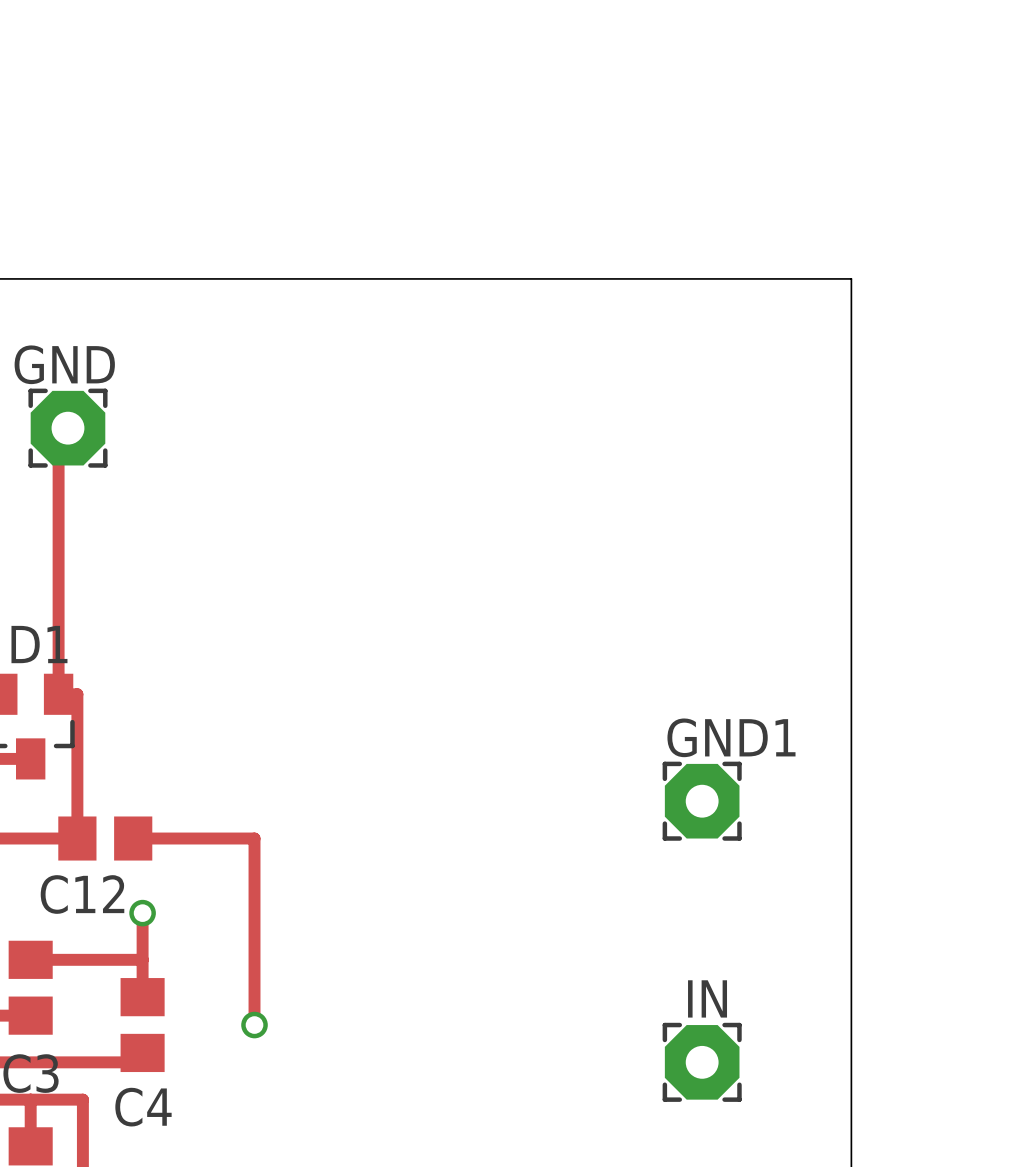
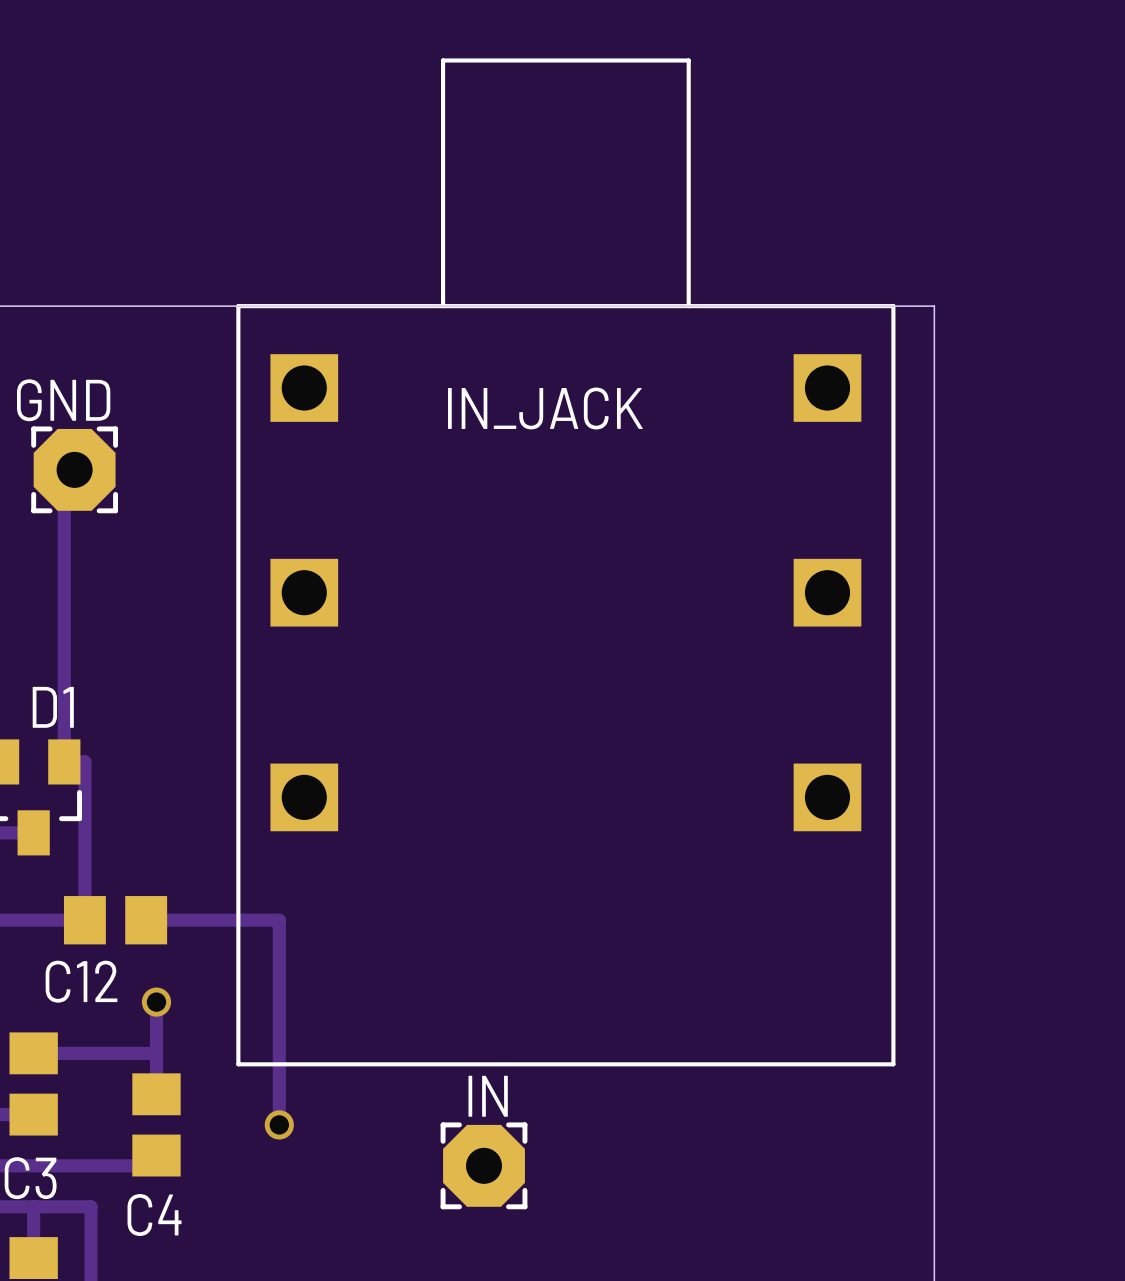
IN_JACK: none -> (565, 562)
GND1: (702, 801) -> none
IN position: (702, 1062) -> (484, 1165)

